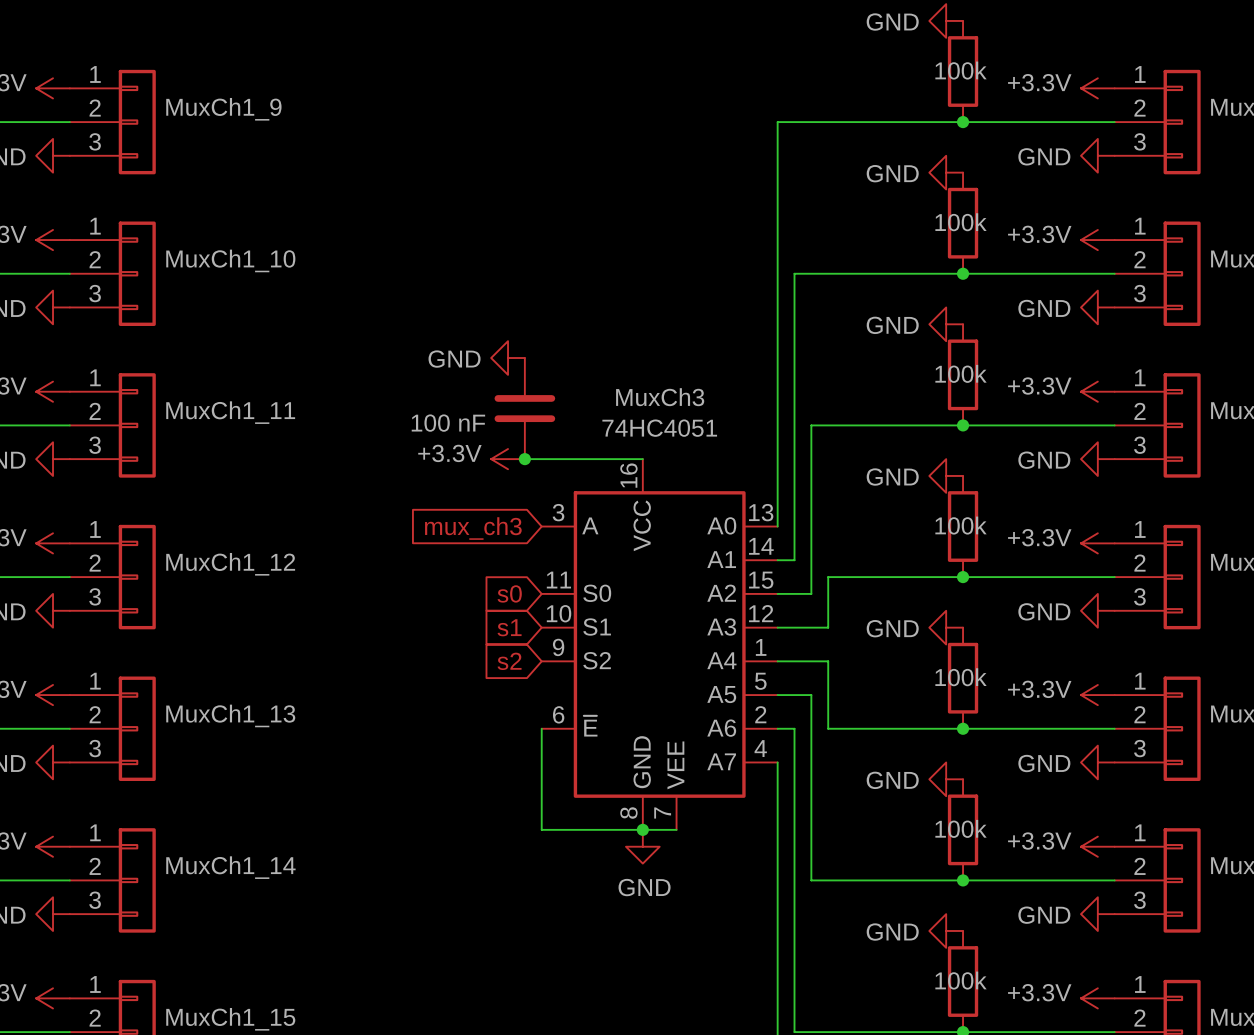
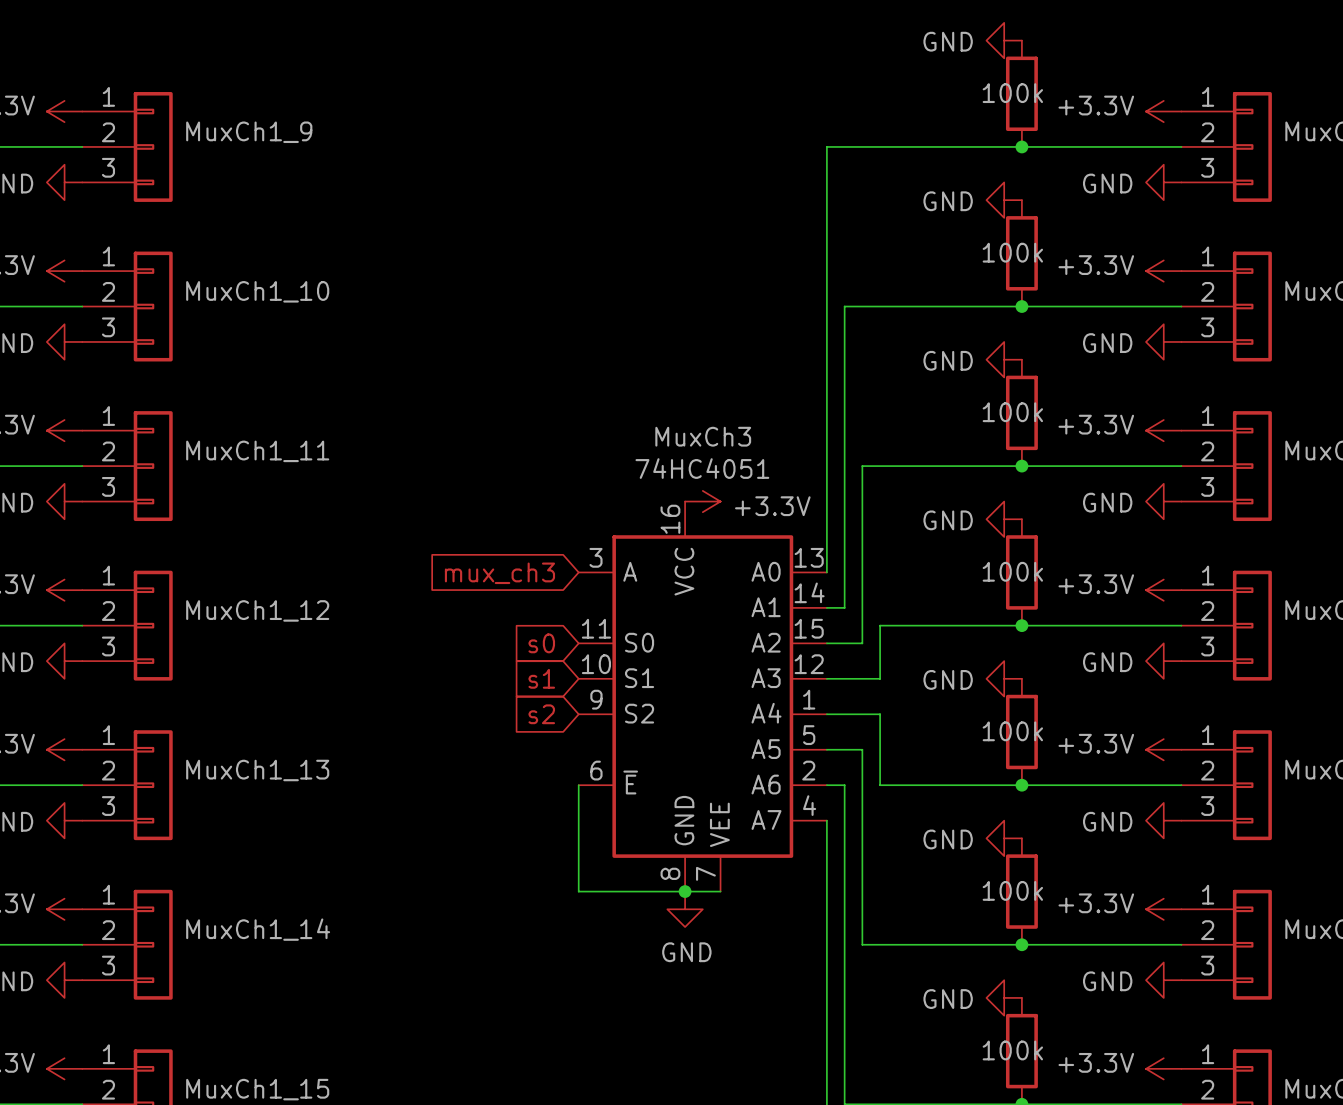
power symbol: GND (508, 358) -> none
part: 100 nF (524, 408) -> none
power symbol rotation: 0° (508, 459) -> 180° (702, 501)
power symbol position: +3.3V (508, 459) -> +3.3V (702, 501)
wire: (524, 459) (642, 459) -> none
junction: (524, 459) -> none

